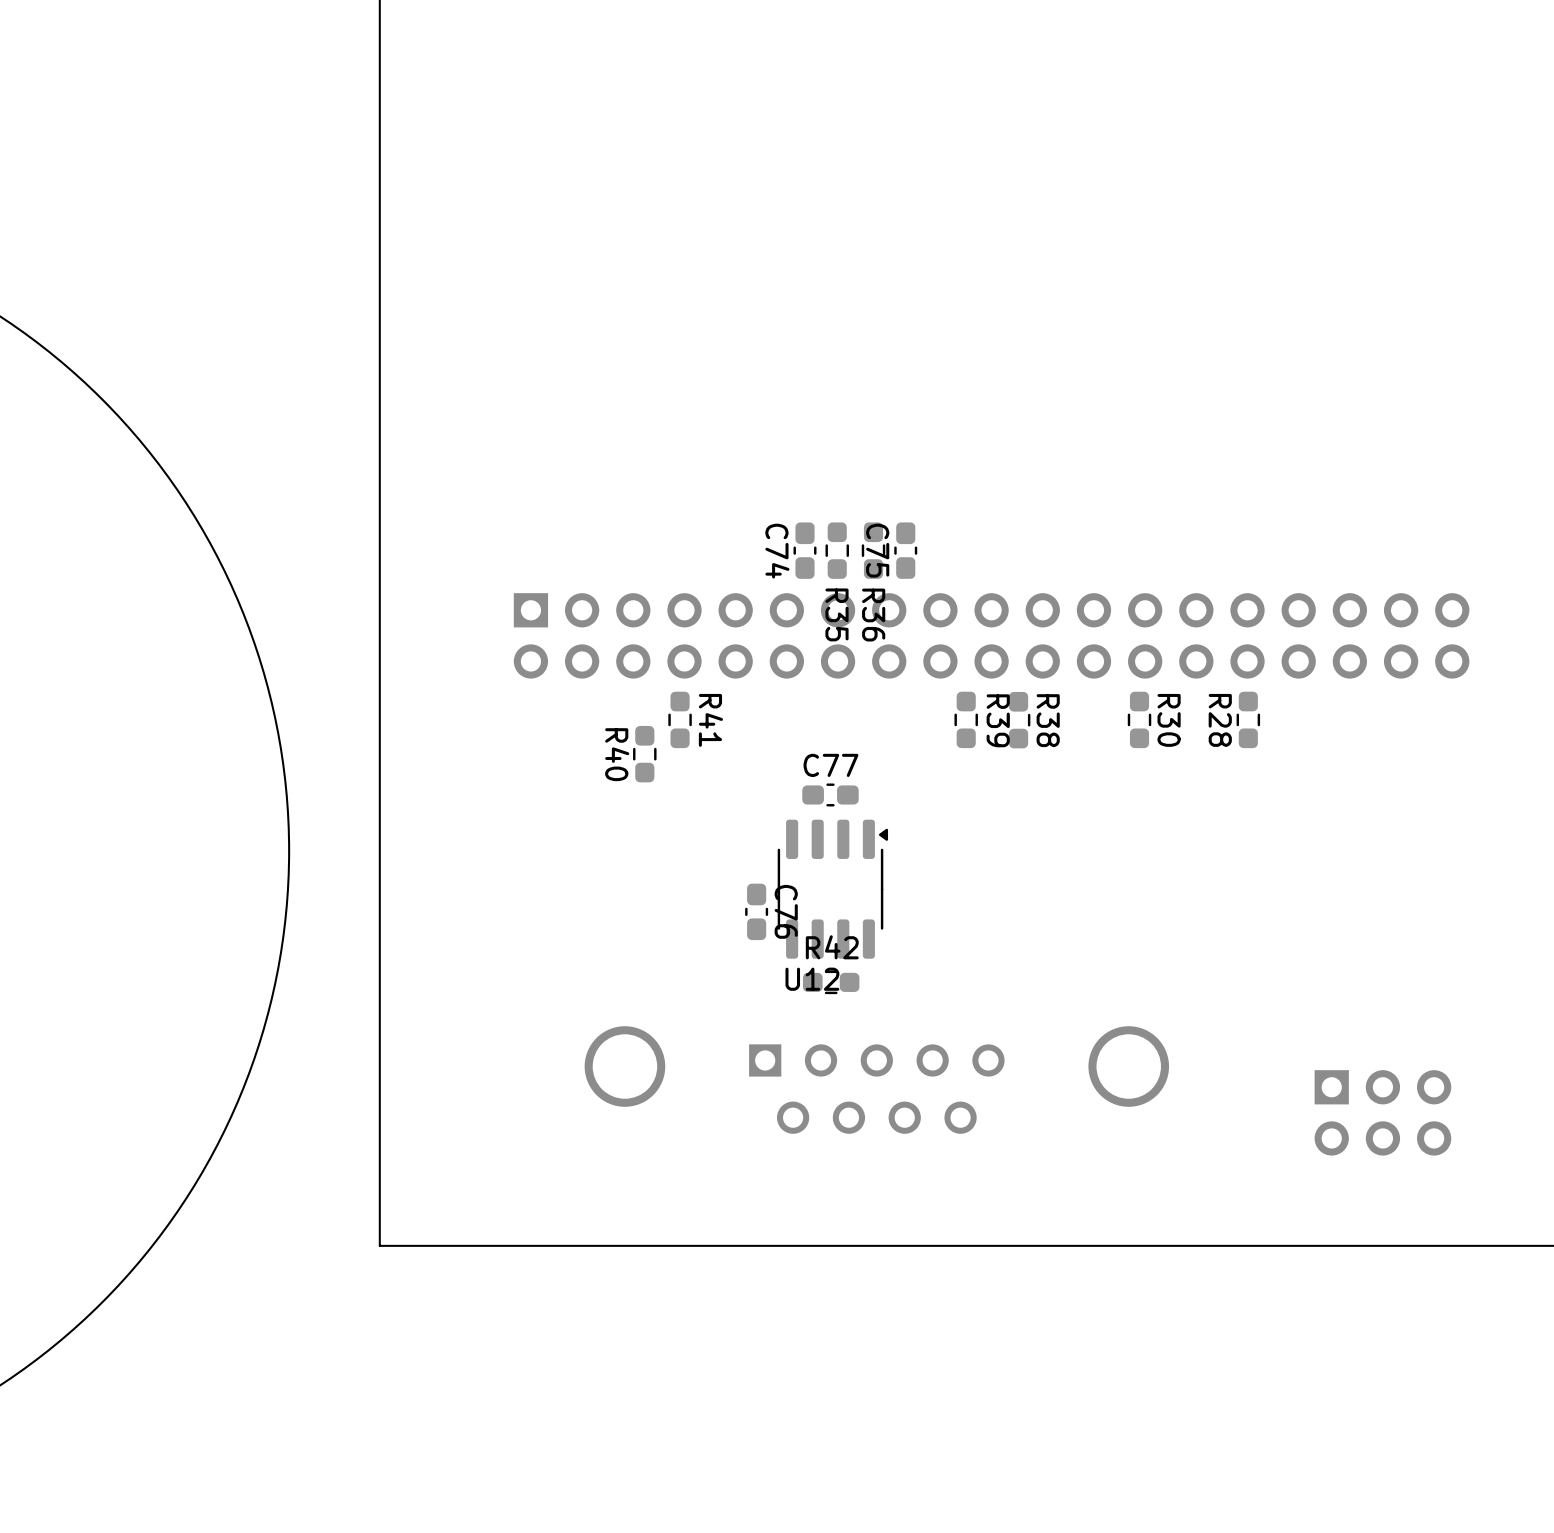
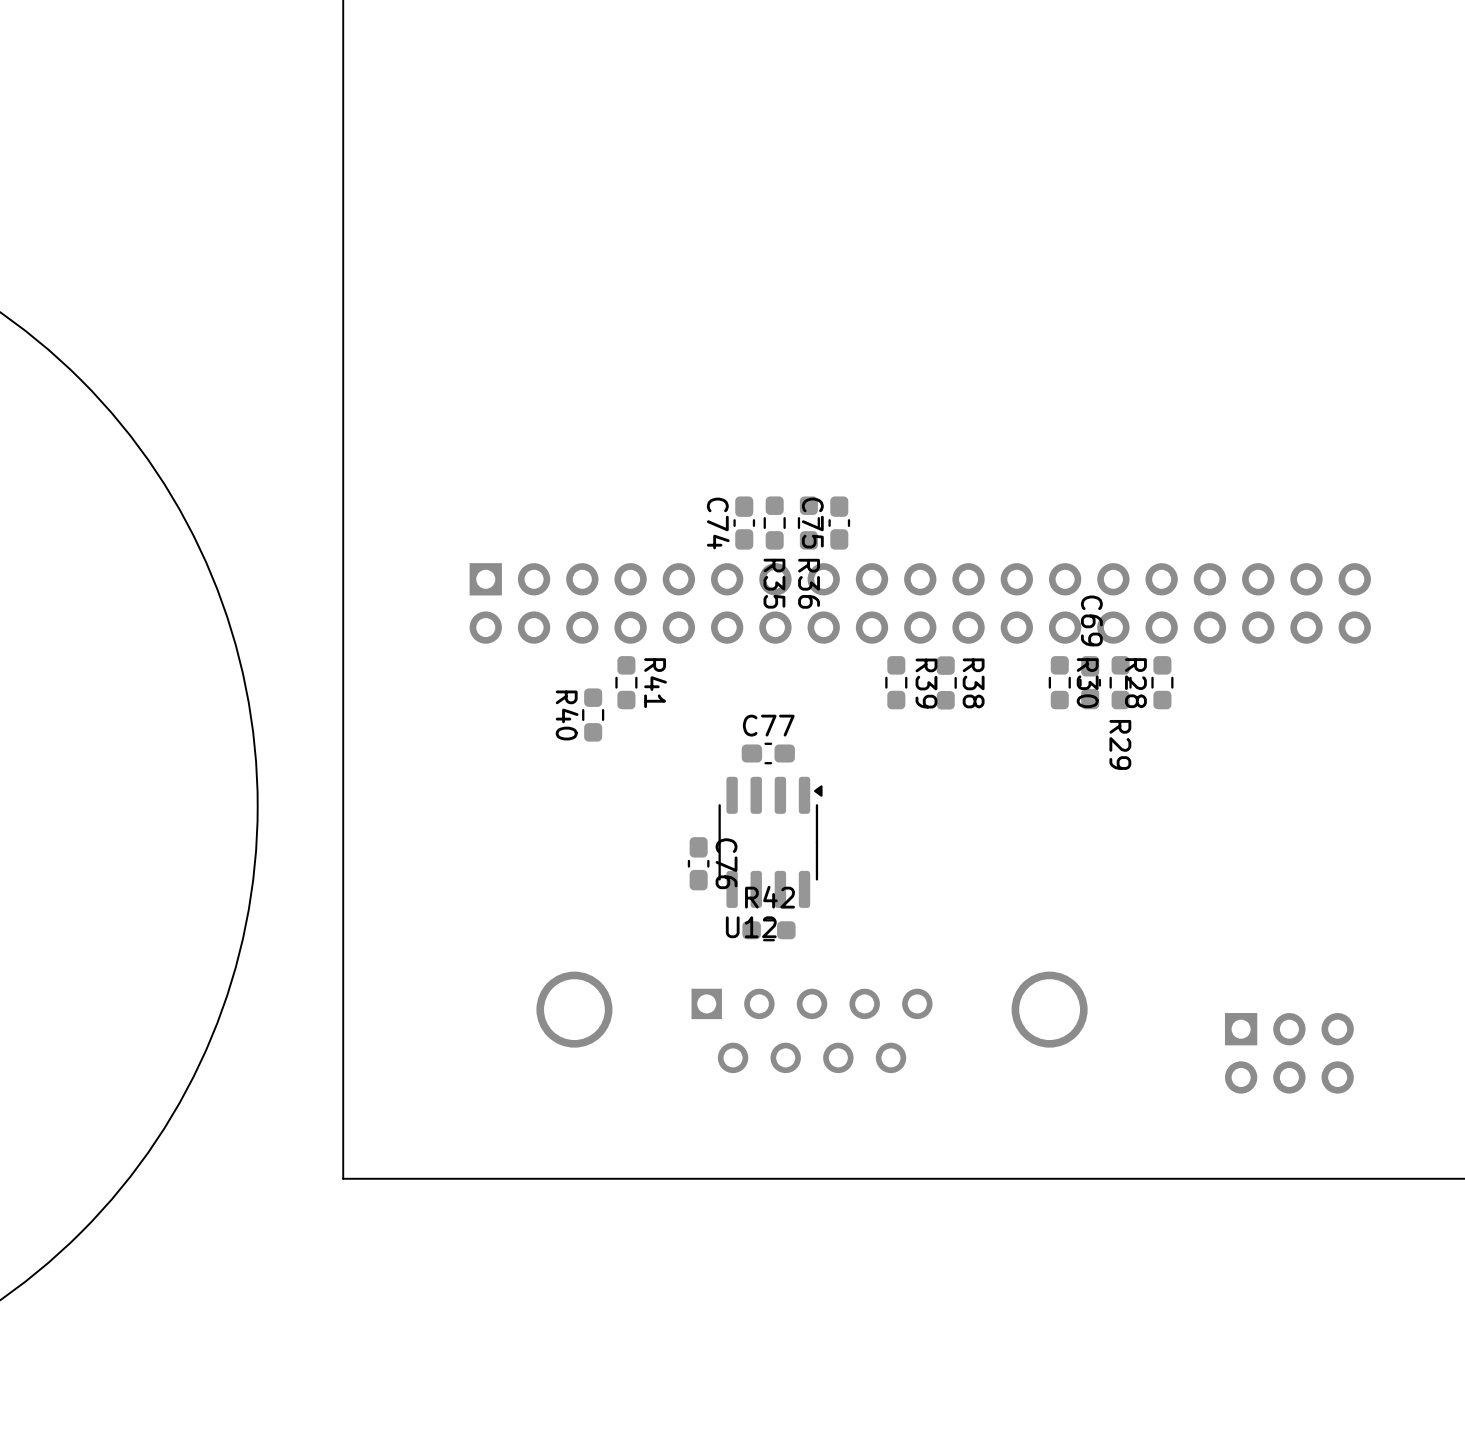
C69: none -> (1090, 682)
R29: none -> (1120, 682)

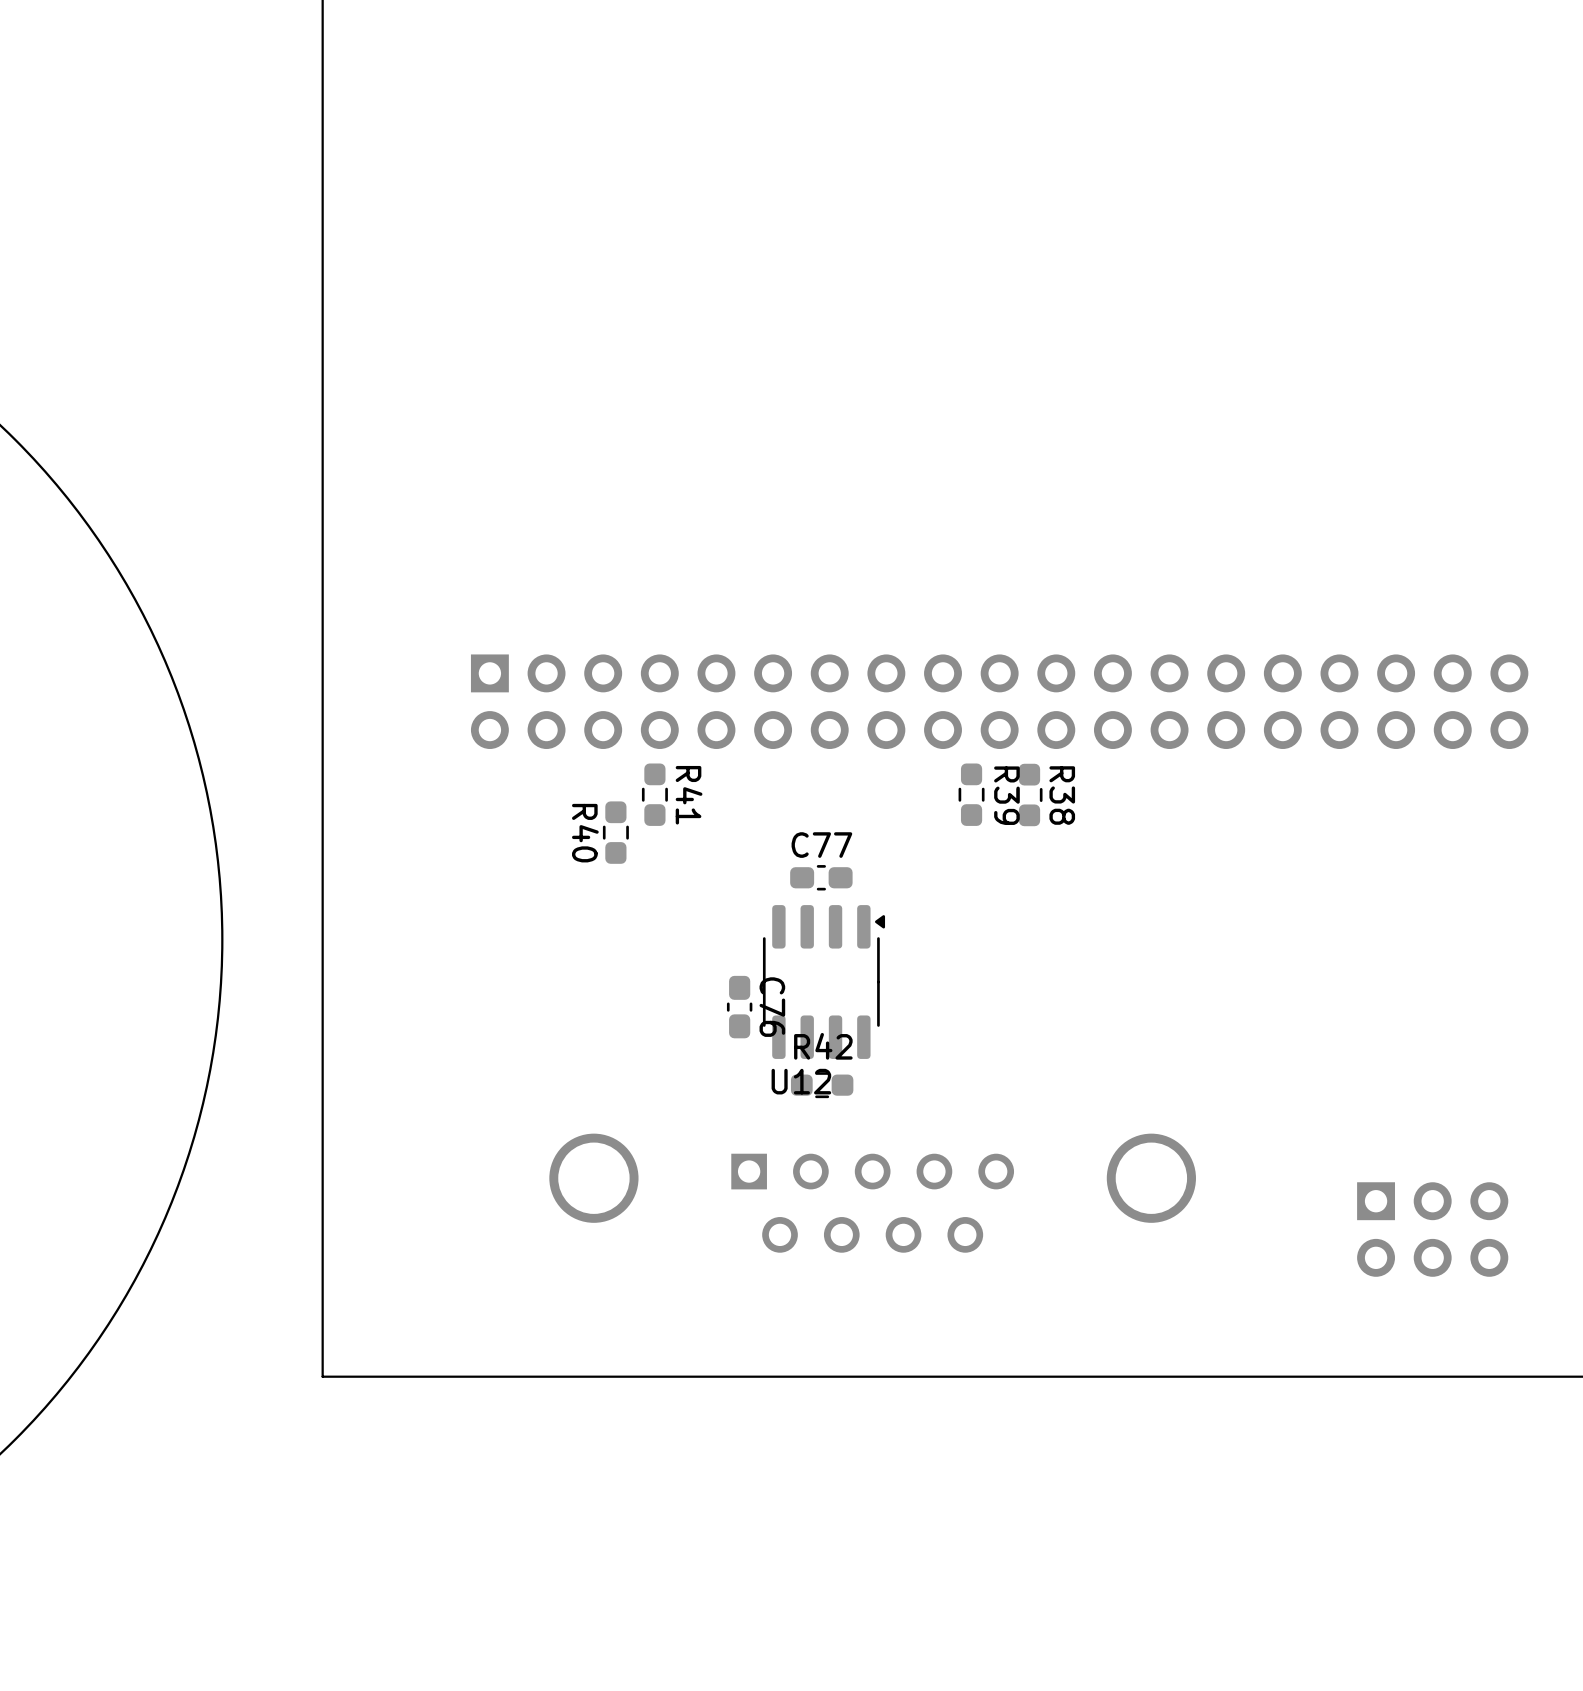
C74: (744, 523) -> none
R35: (774, 523) -> none
R36: (808, 523) -> none
C75: (839, 523) -> none
R30: (1059, 682) -> none
C69: (1090, 682) -> none
R29: (1120, 682) -> none
R28: (1162, 682) -> none

